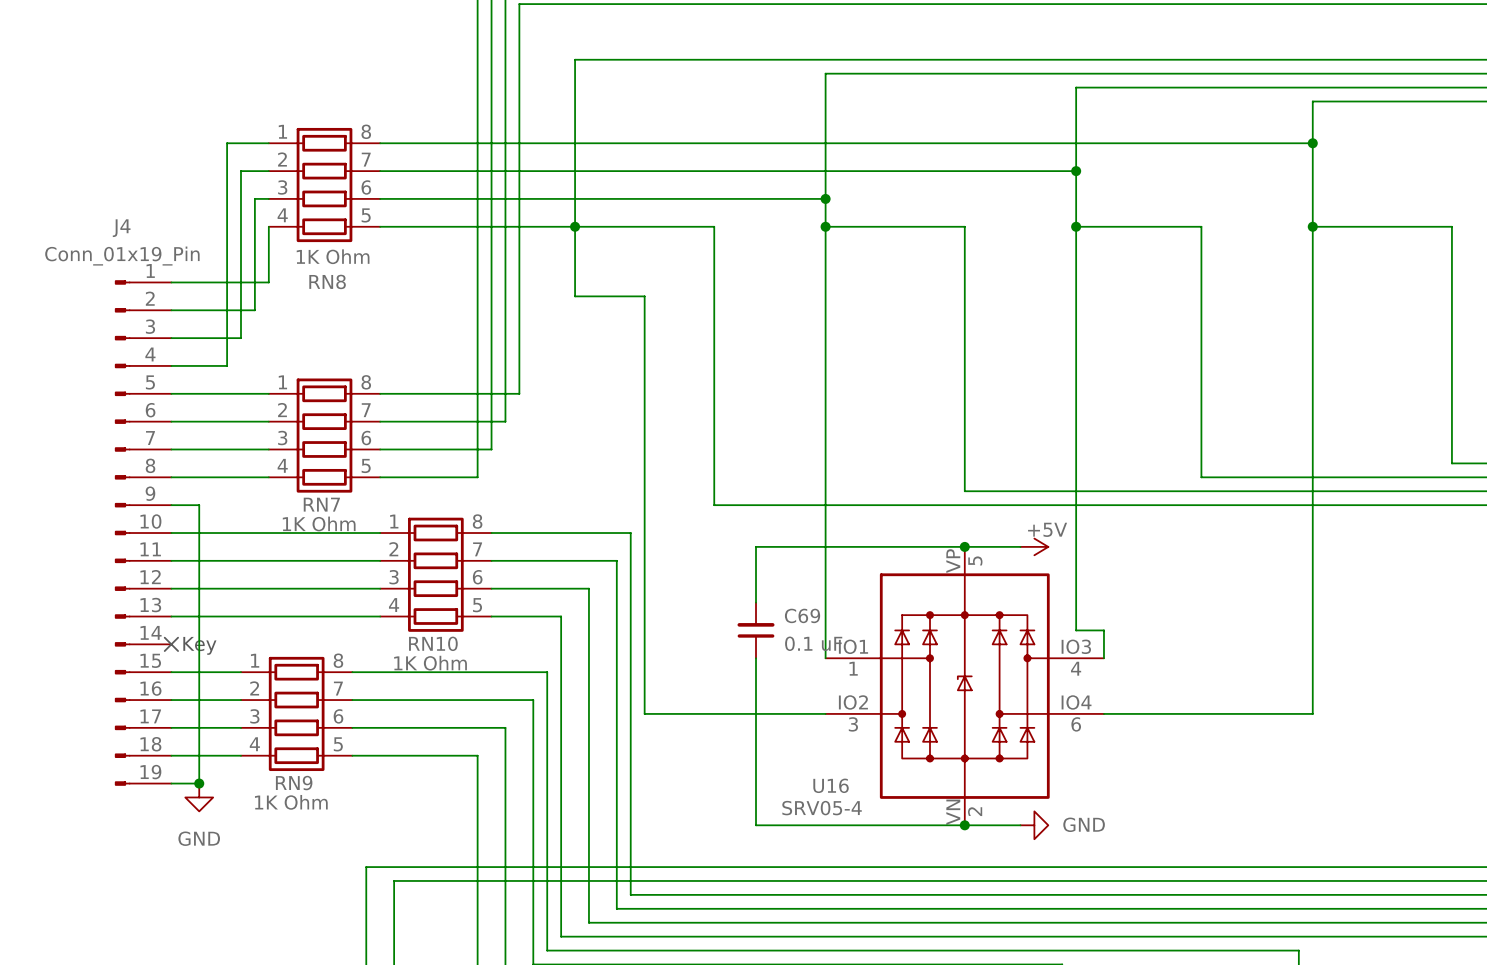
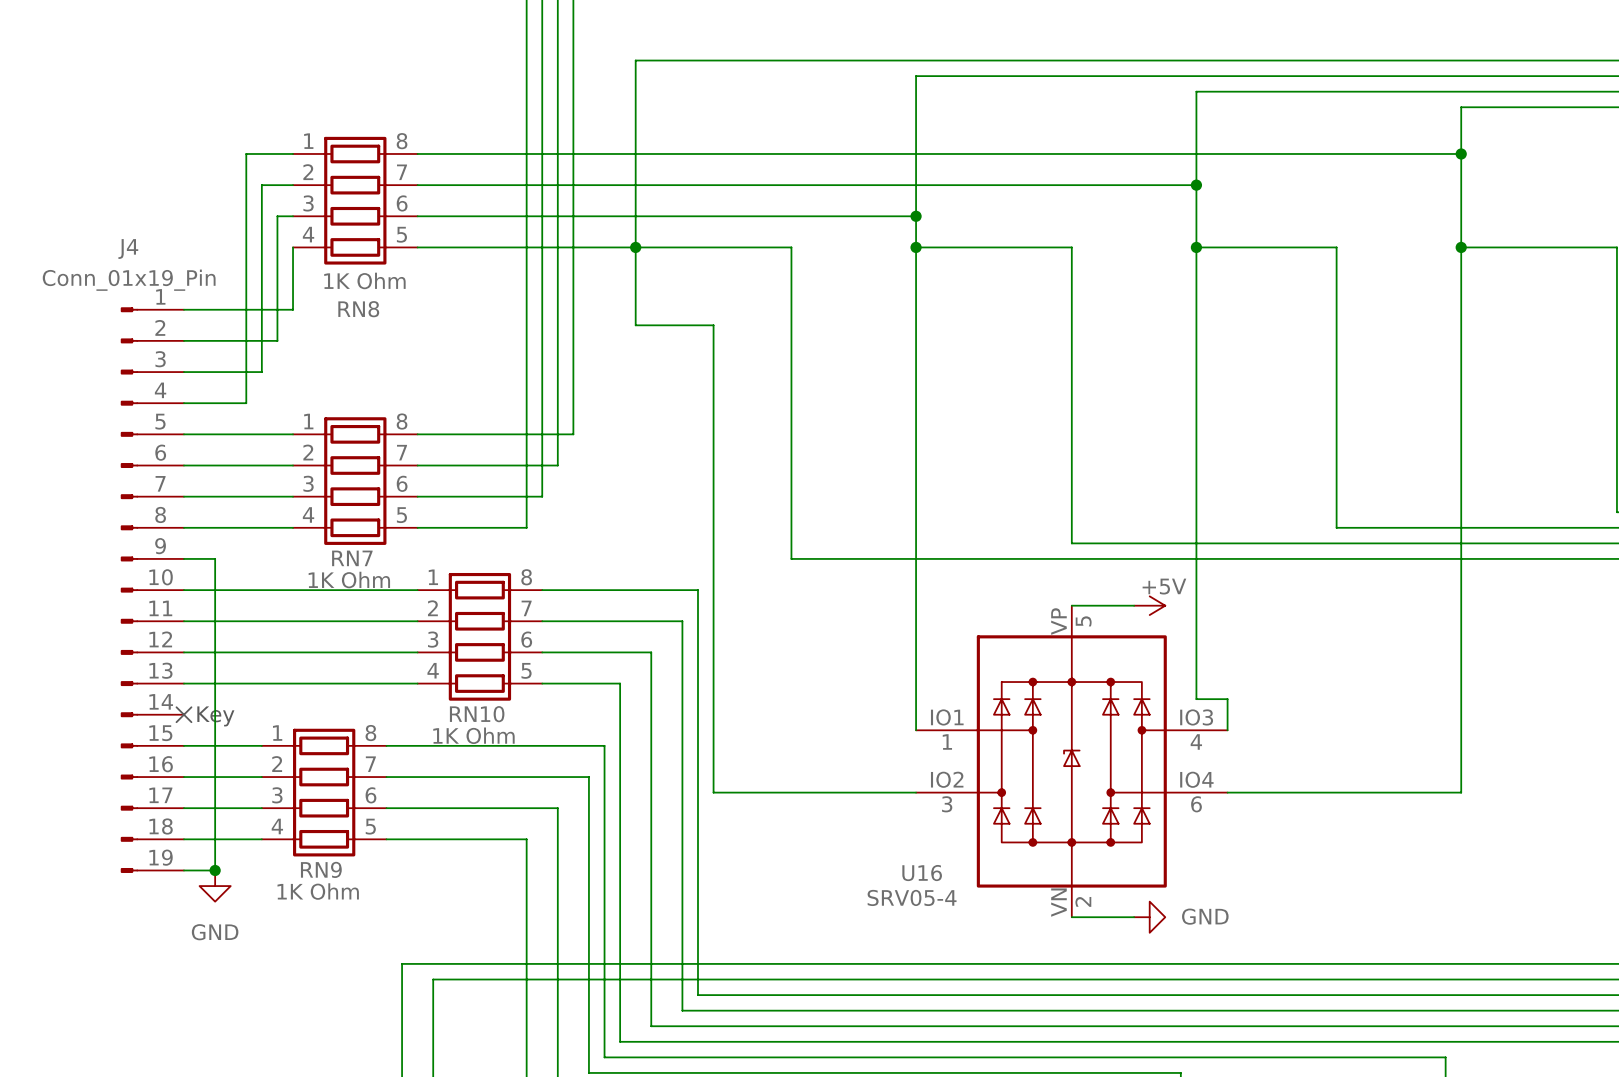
wire: (964, 546) (756, 546) (756, 602) -> none
junction: (964, 546) -> none
C69: 0.1 uF (756, 630) -> none
wire: (756, 658) (756, 825) (964, 825) -> none
junction: (964, 825) -> none

